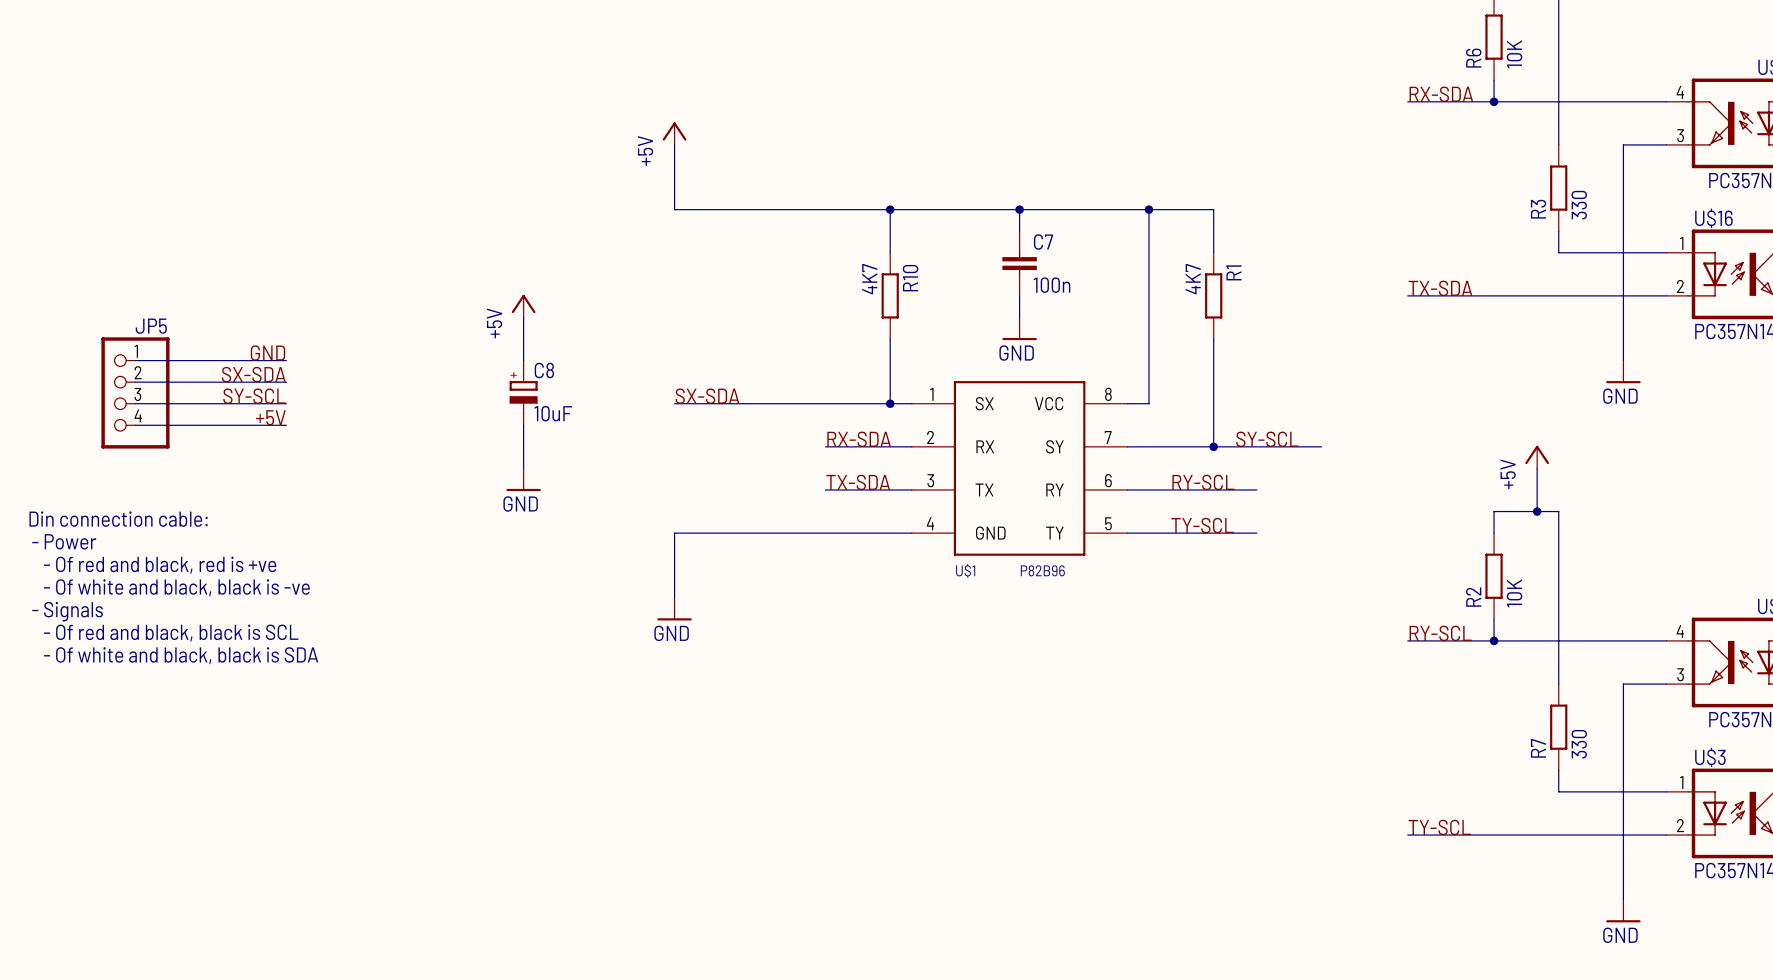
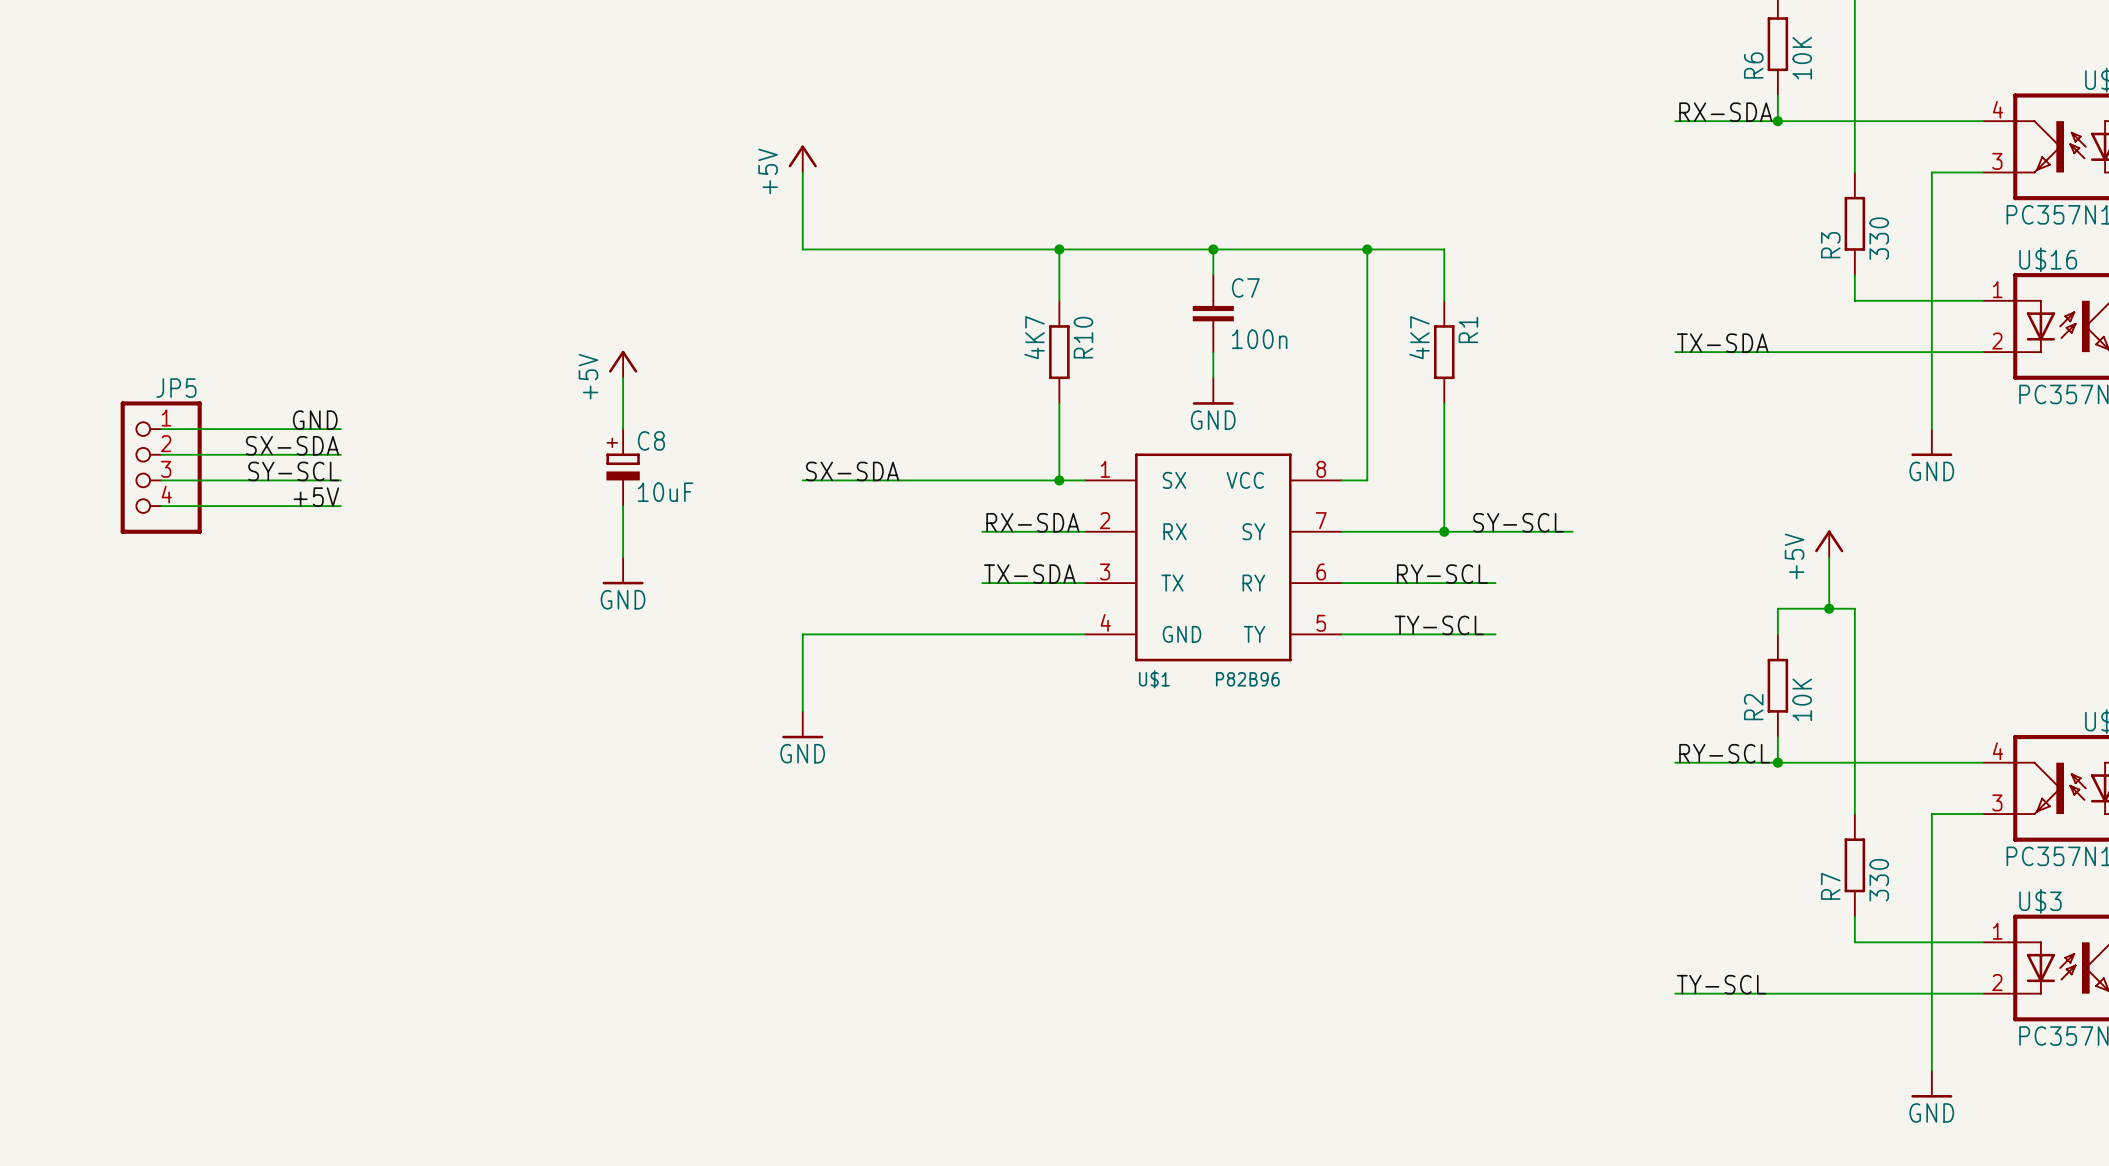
text: Din connection cable: (118, 519) -> none
text: - Power (64, 541) -> none
text: - Of red and black, red is +ve (160, 565) -> none
text: - Of white and black, black is -ve (176, 587) -> none
text: - Signals (67, 611) -> none
text: - Of red and black, black is SCL (171, 633) -> none
text: - Of white and black, black is SDA (181, 655) -> none

